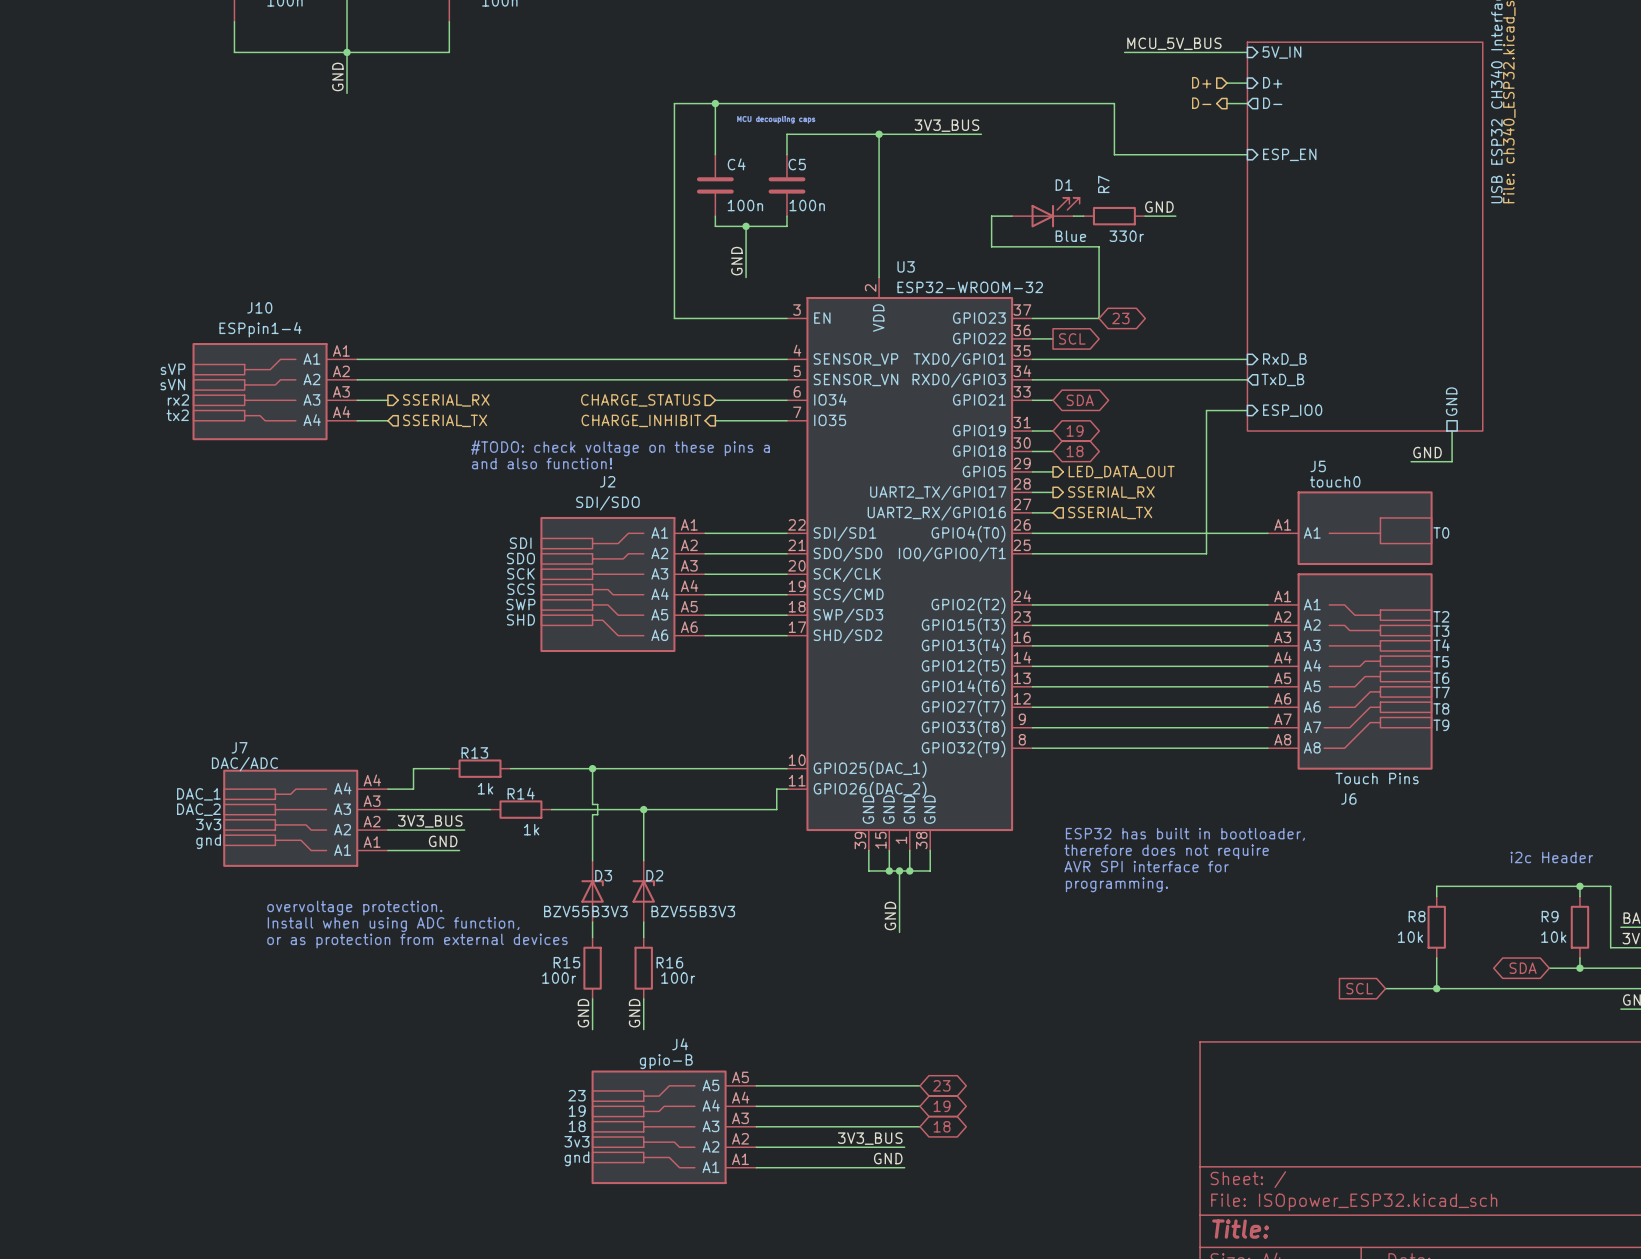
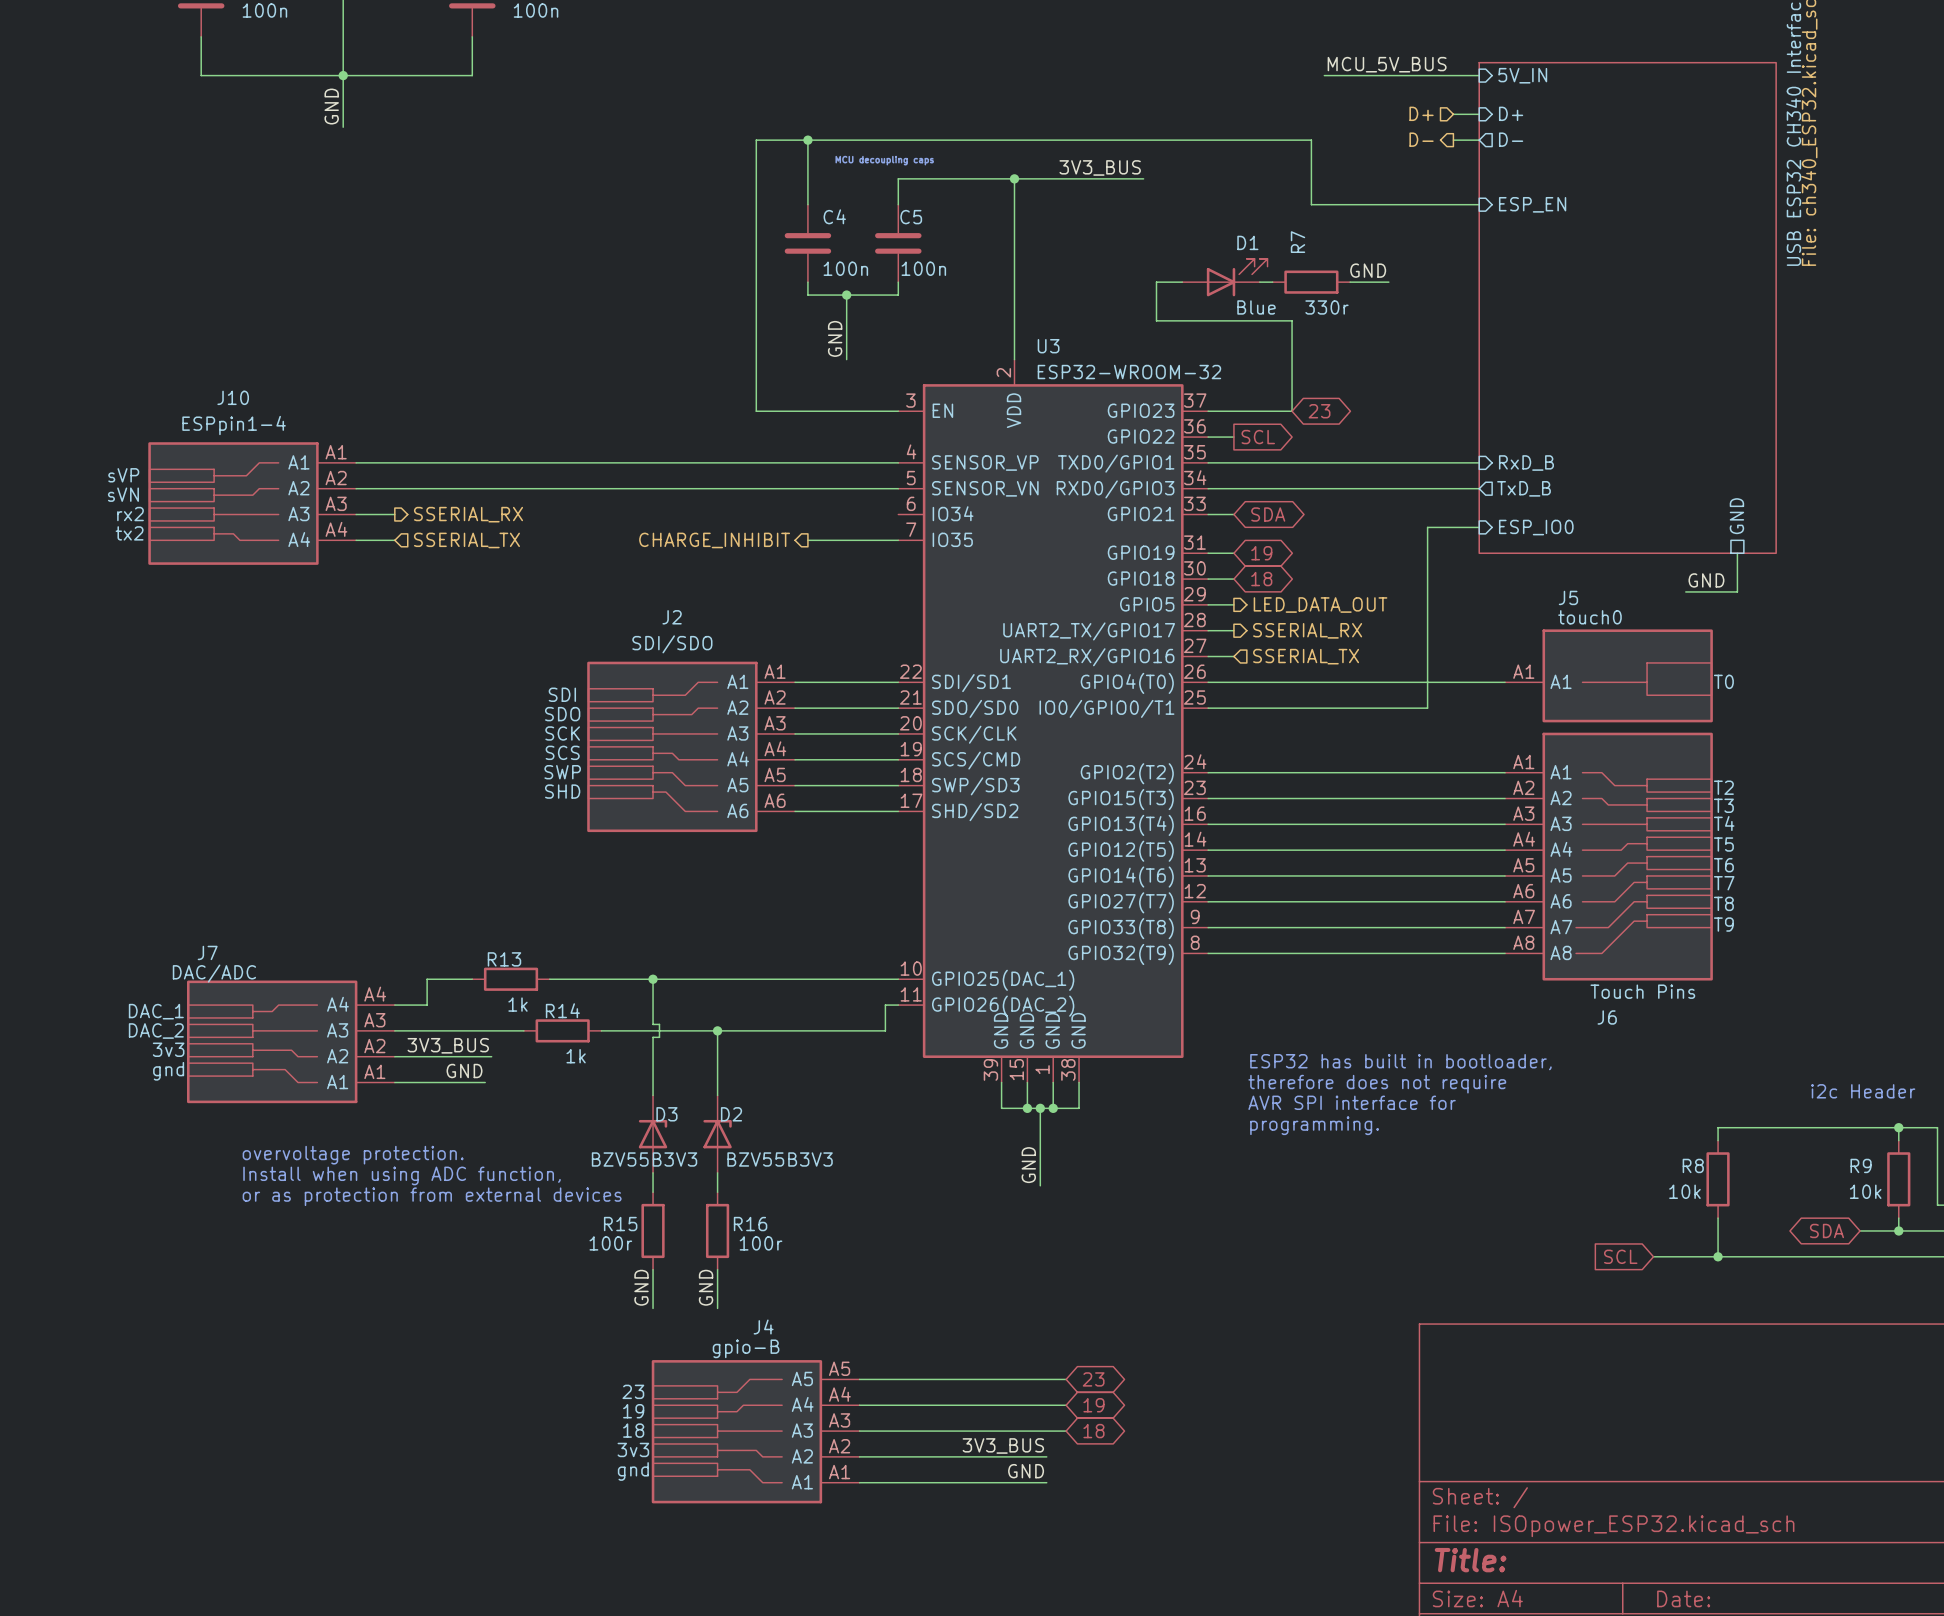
hierarchical label: CHARGE_STATUS (640, 400) -> none
wire: (715, 400) (786, 400) -> none
text: #TODO: check voltage on these pins a (620, 448) -> none
text: and also function! (541, 463) -> none

